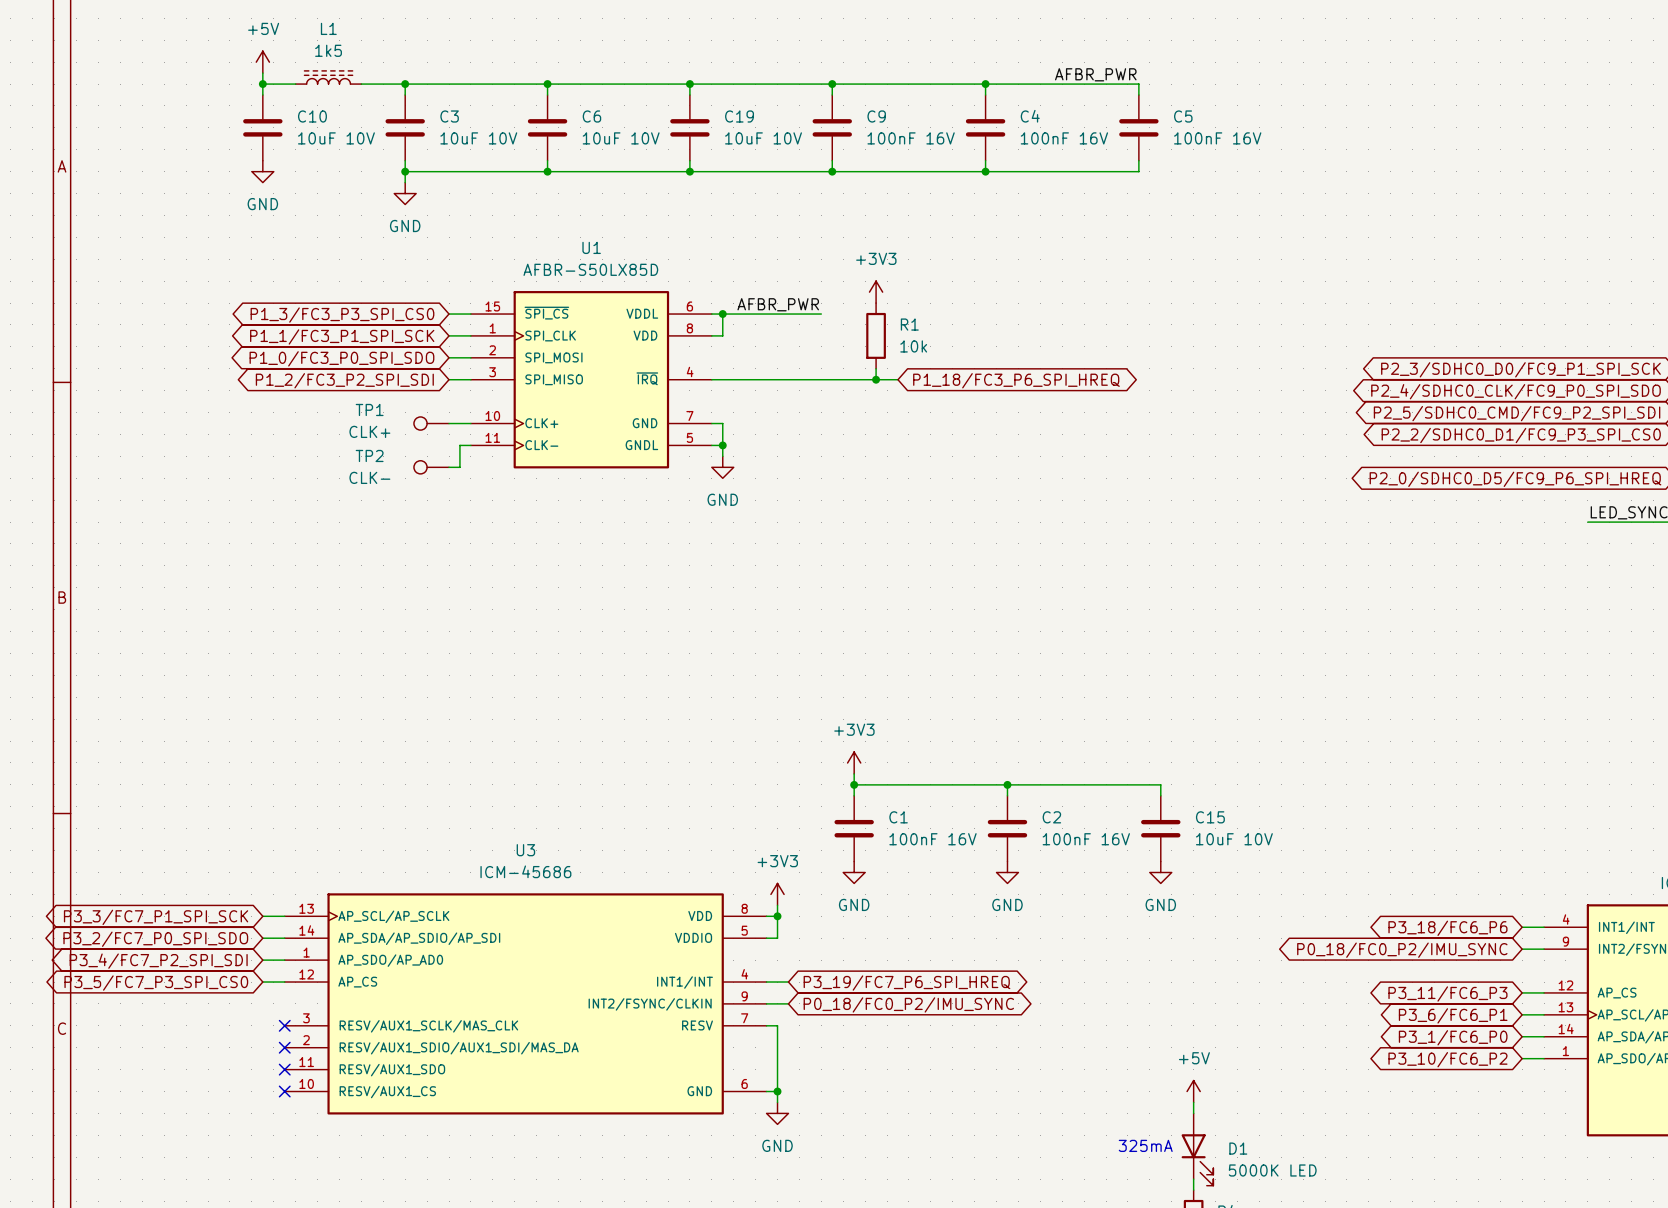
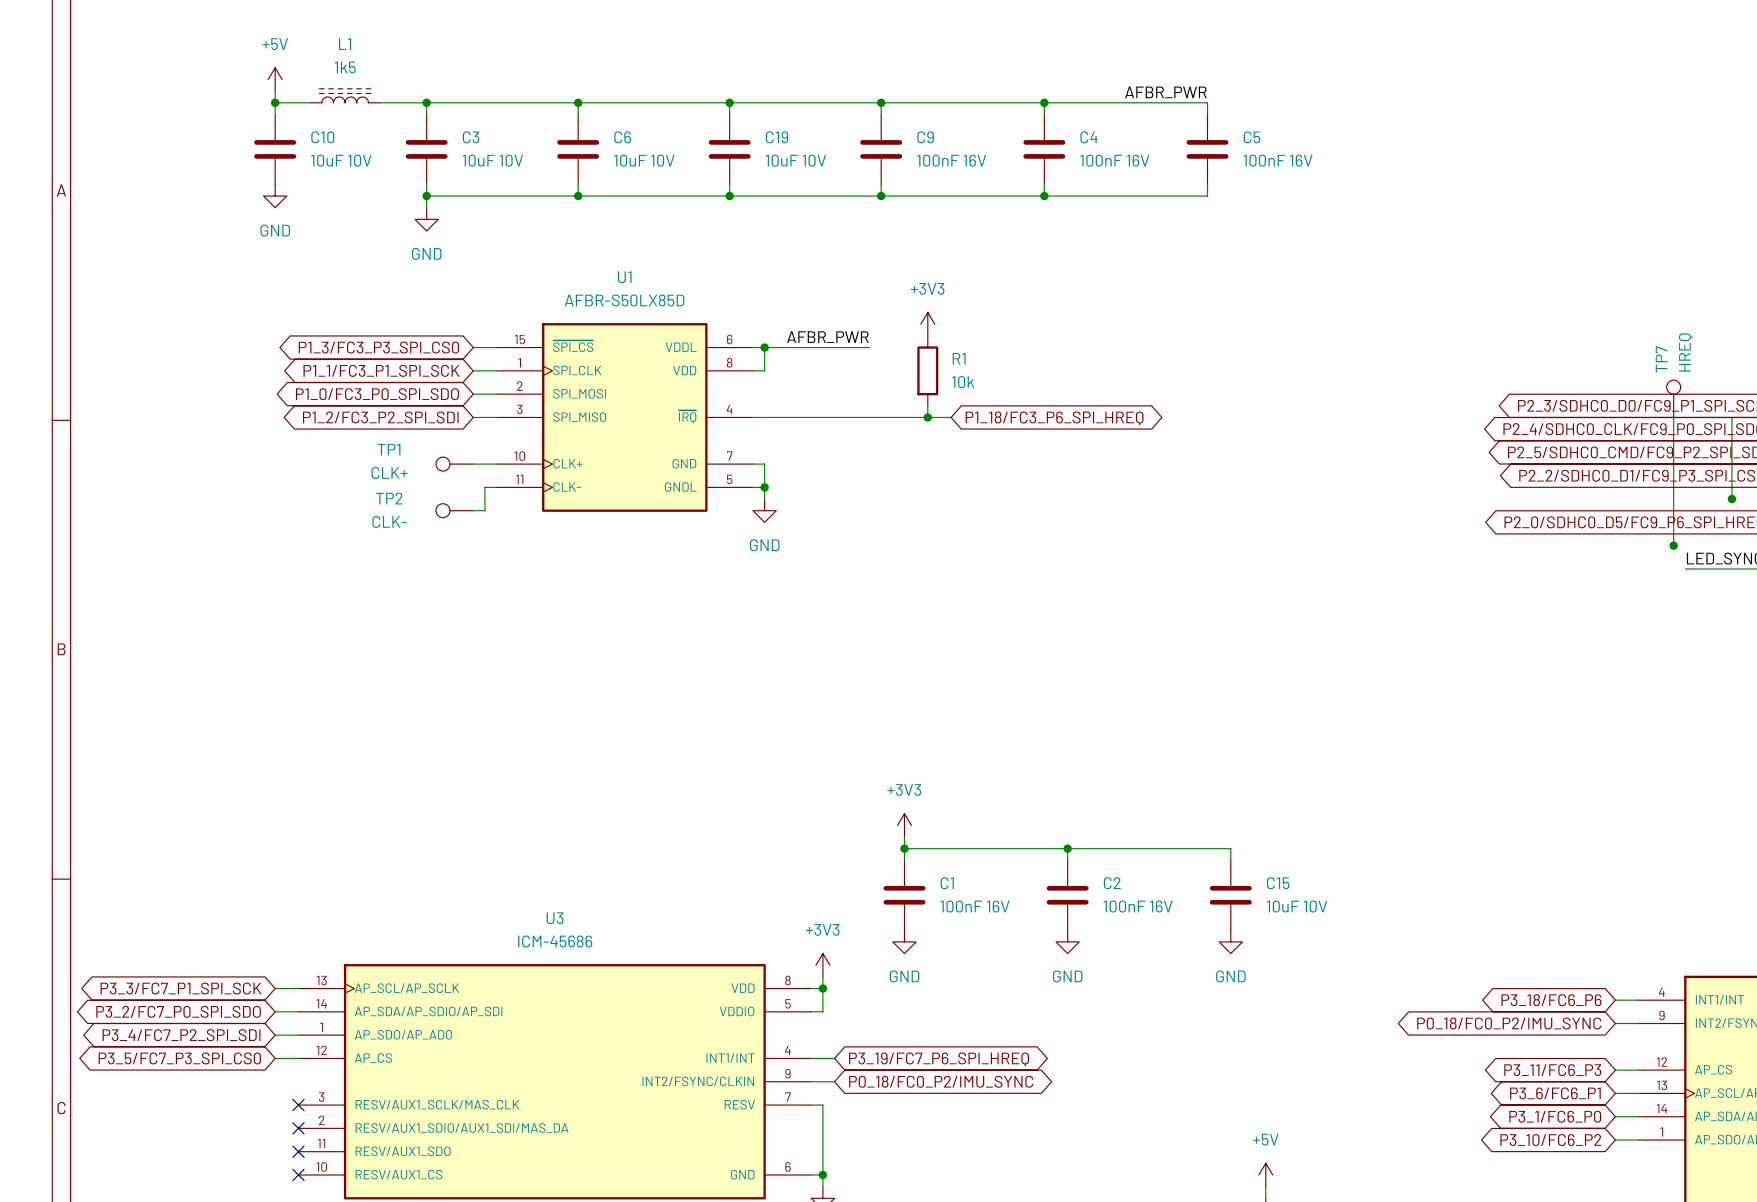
TP7: none -> HREQ (1673, 398)
wire: none -> (1673, 417) (1673, 545)
wire: none -> (1731, 417) (1731, 499)
junction: none -> (1731, 499)
junction: none -> (1673, 545)

